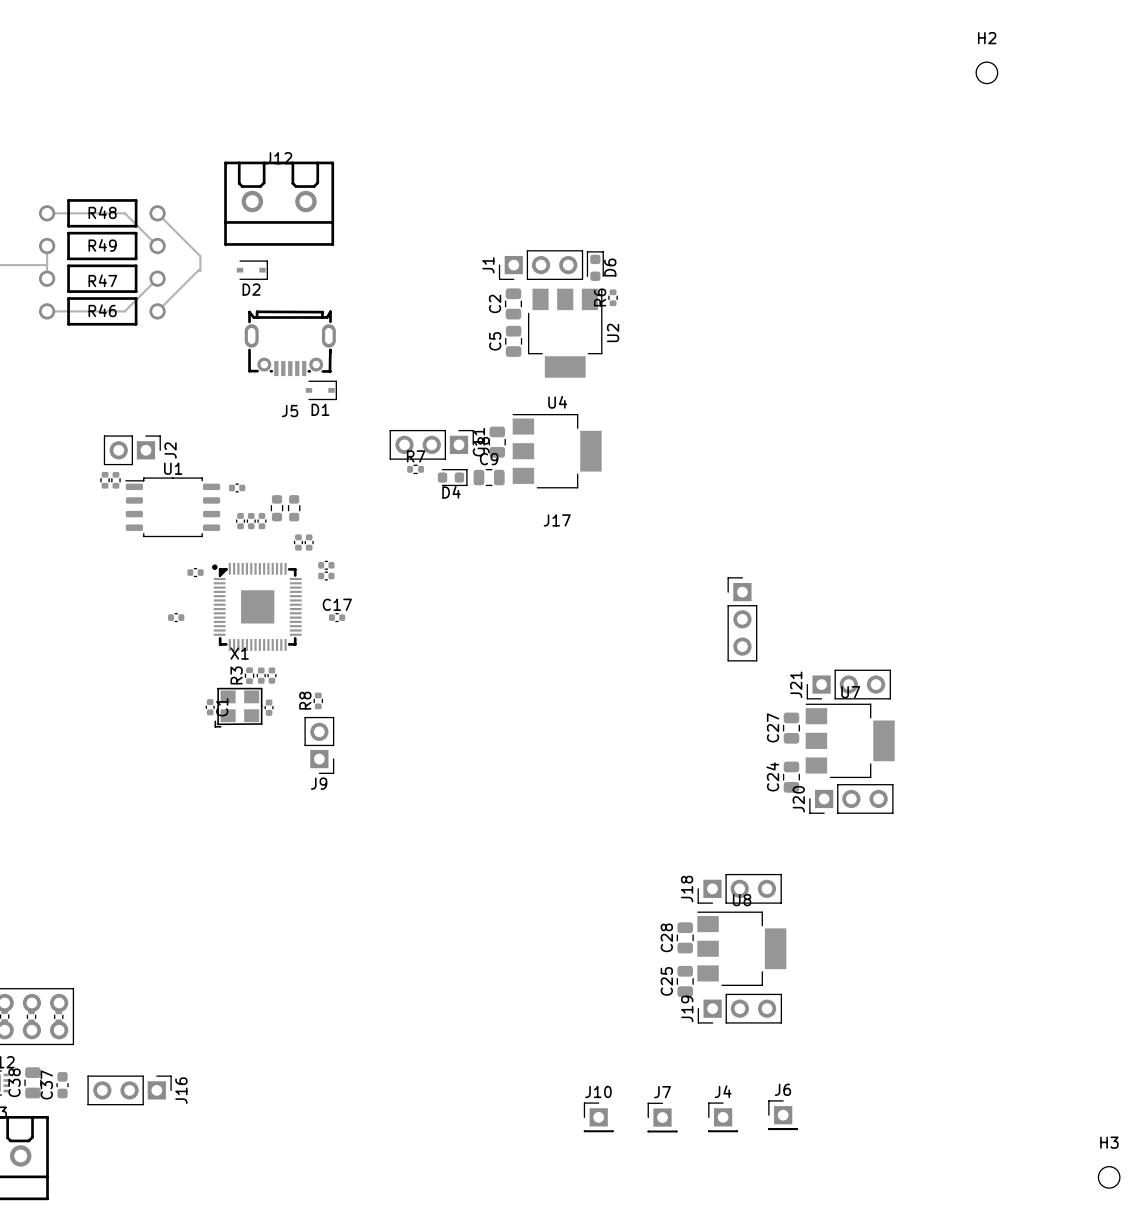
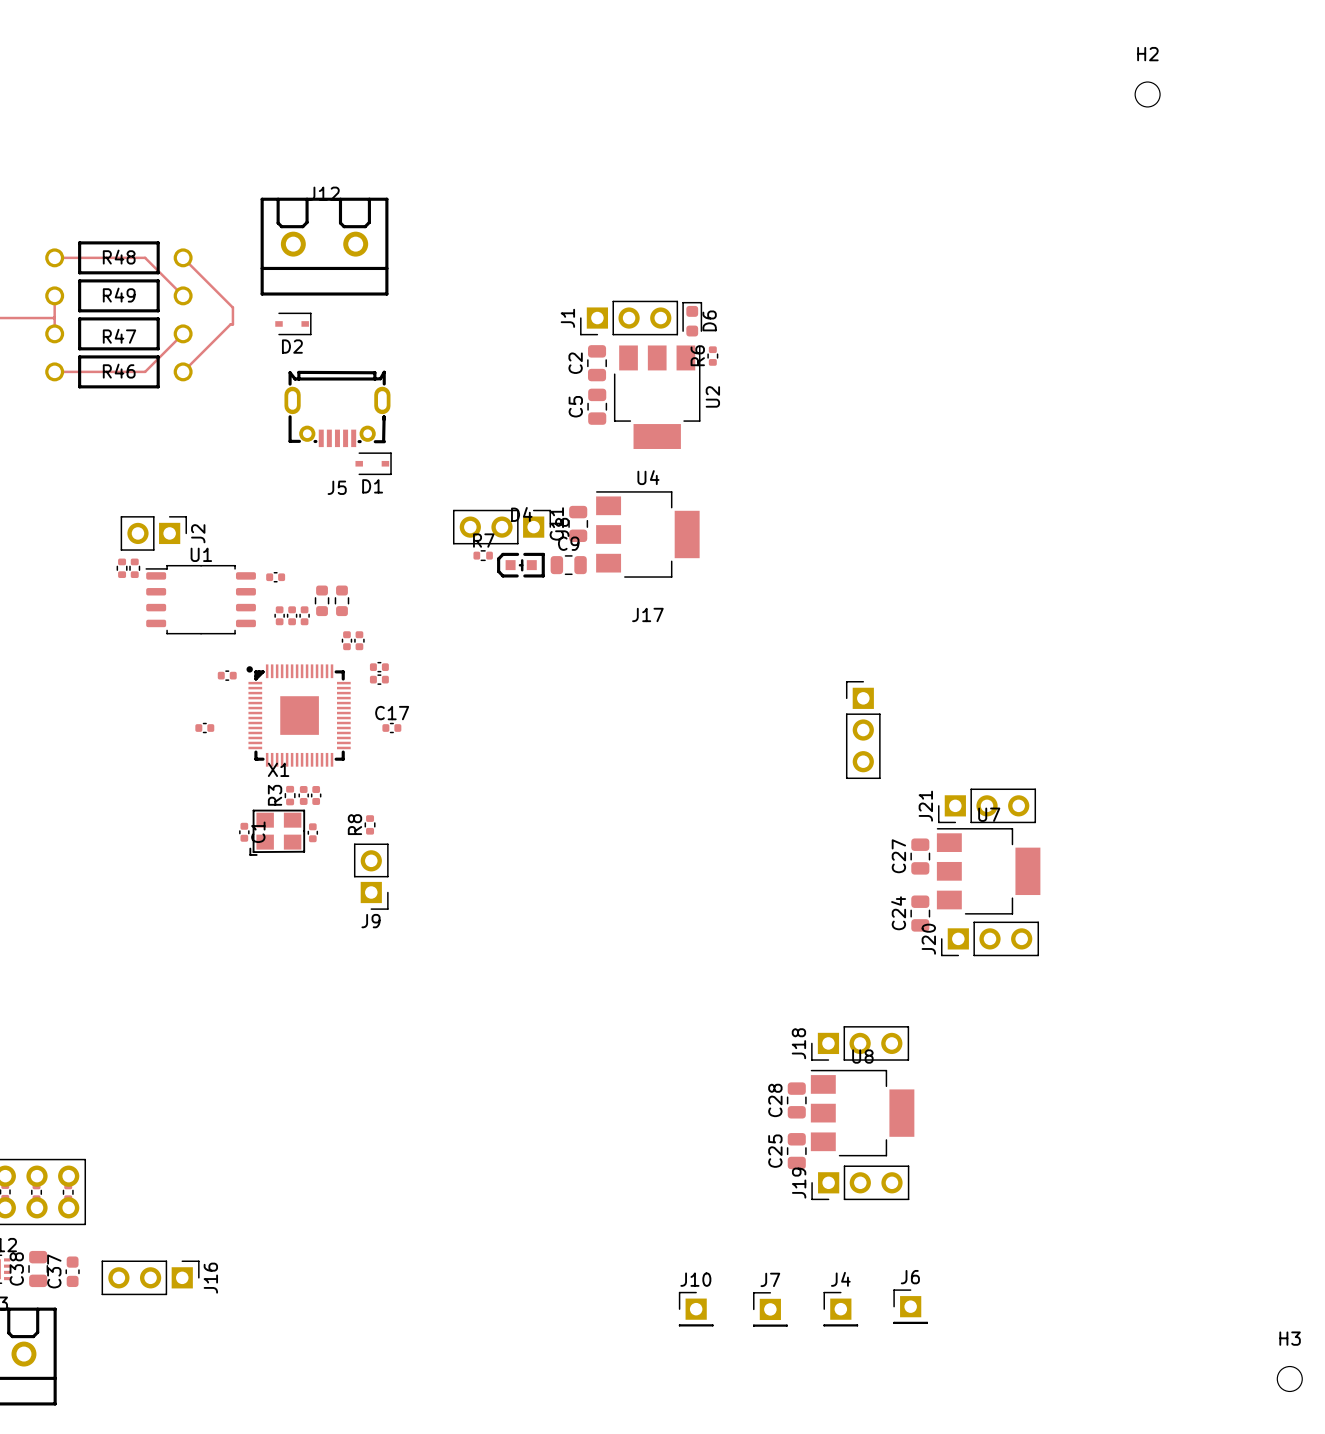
D4 footprint: [437, 469, 468, 487] -> [497, 552, 545, 578]
D4 name position: D4 (451, 492) -> D4 (521, 514)

